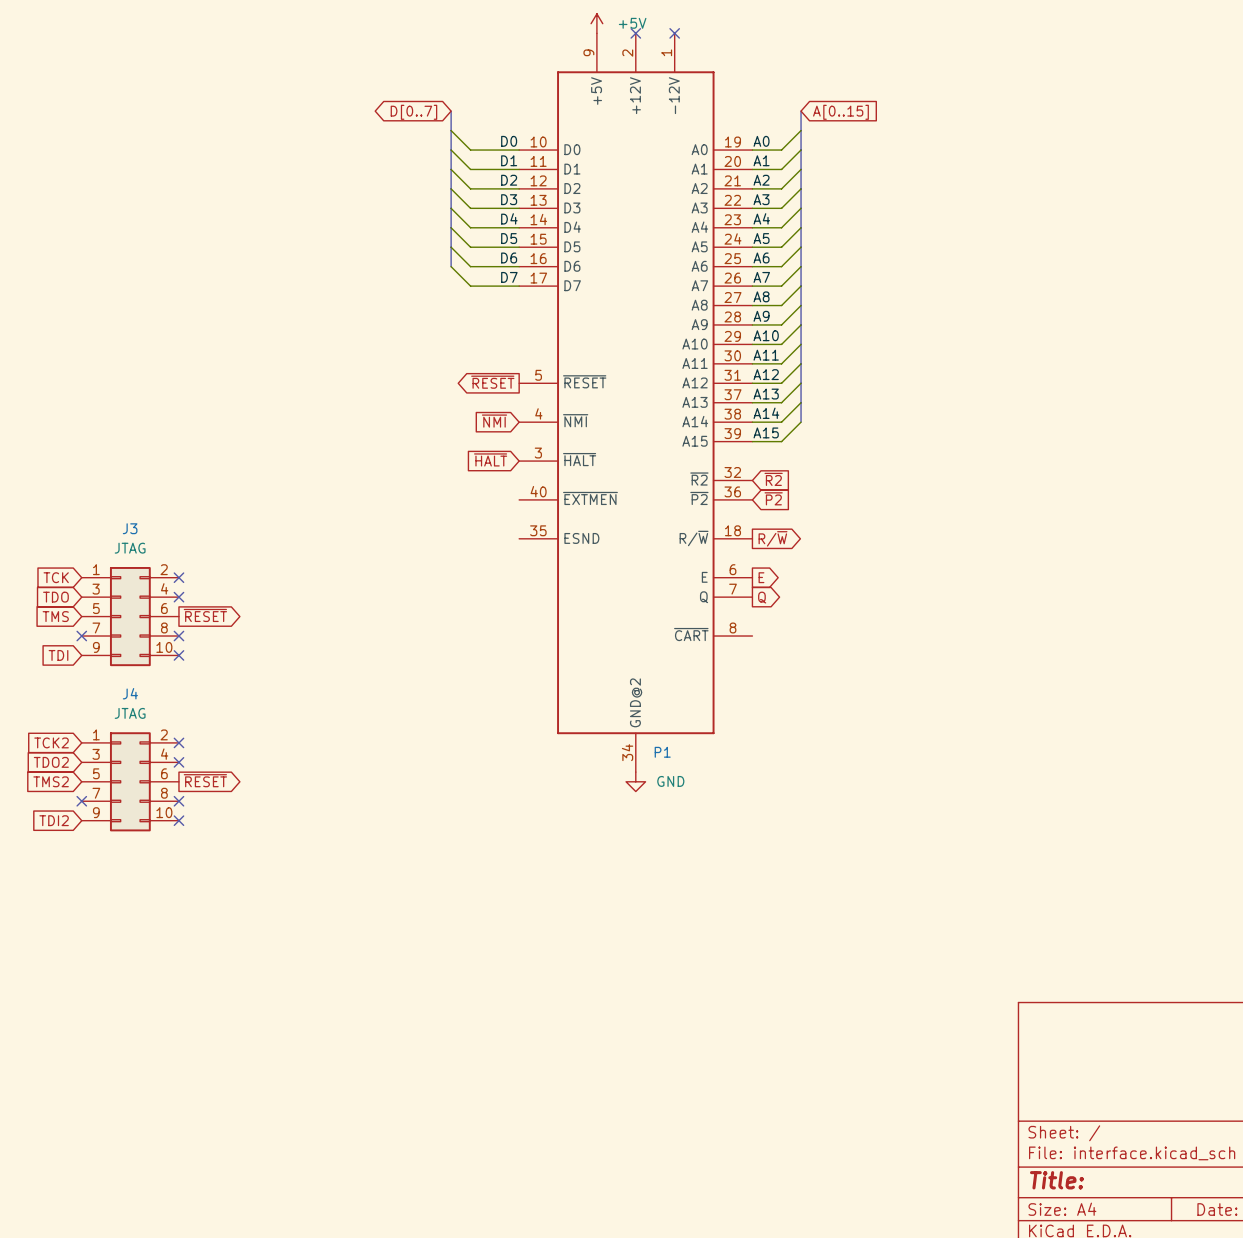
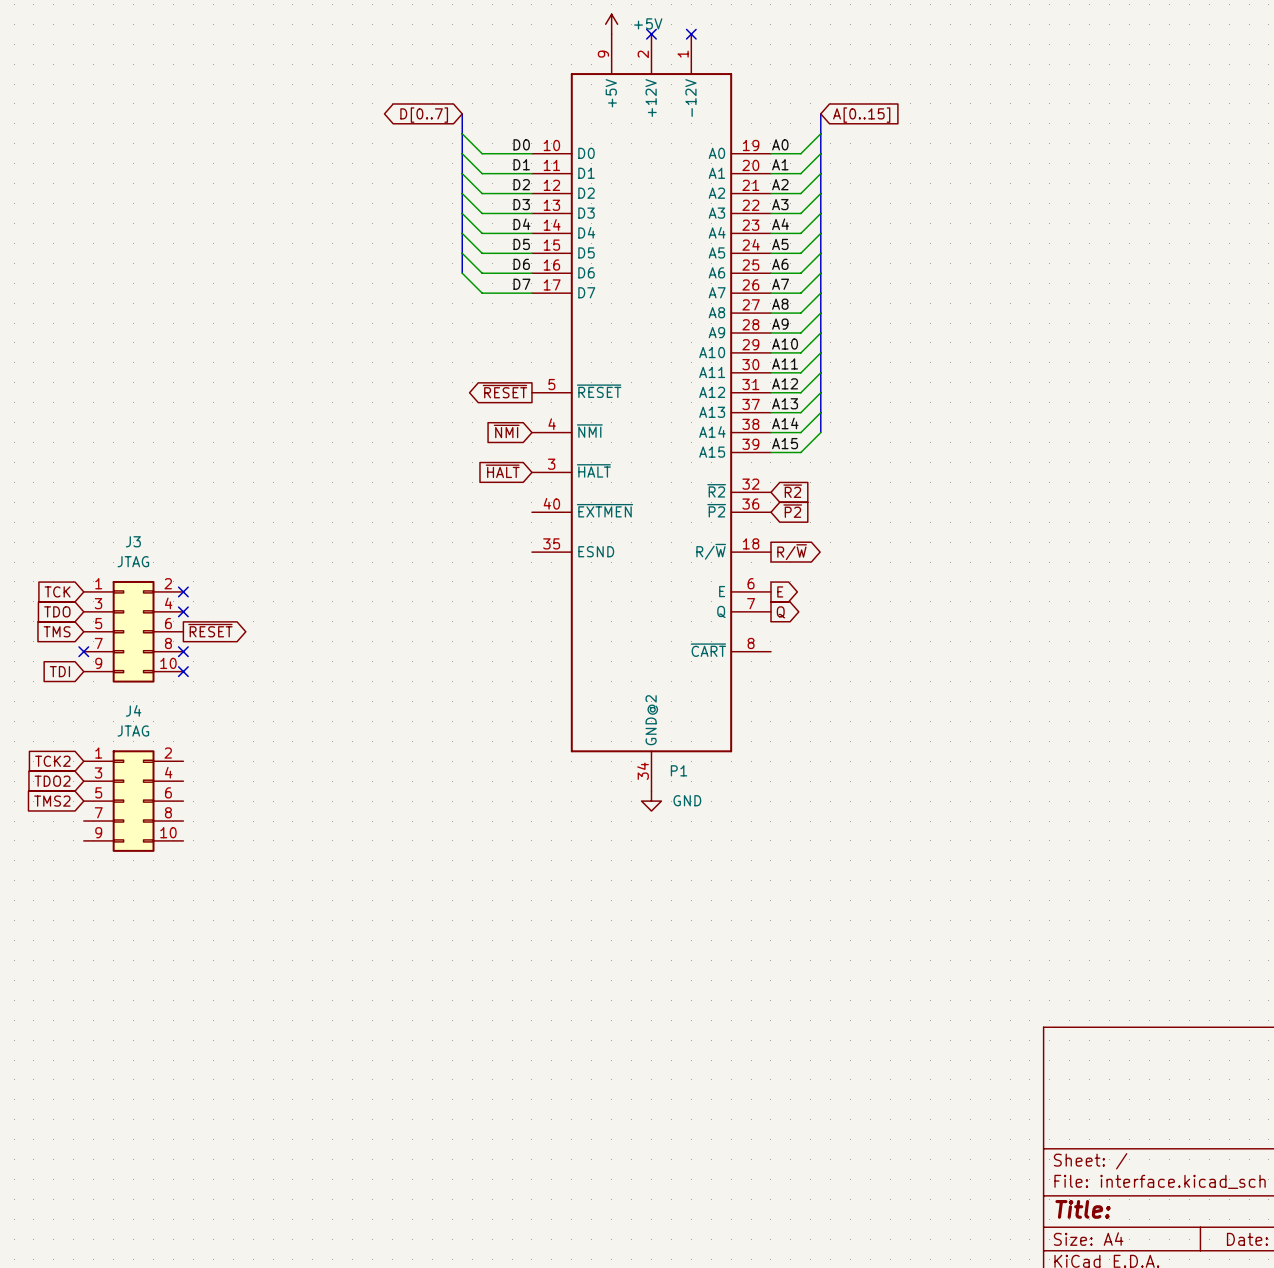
no-connect mark: (178, 742) -> none
no-connect mark: (178, 762) -> none
global label: ~{RESET} (205, 780) -> none
no-connect mark: (81, 801) -> none
no-connect mark: (178, 801) -> none
global label: TDI2 (54, 820) -> none
no-connect mark: (178, 820) -> none

